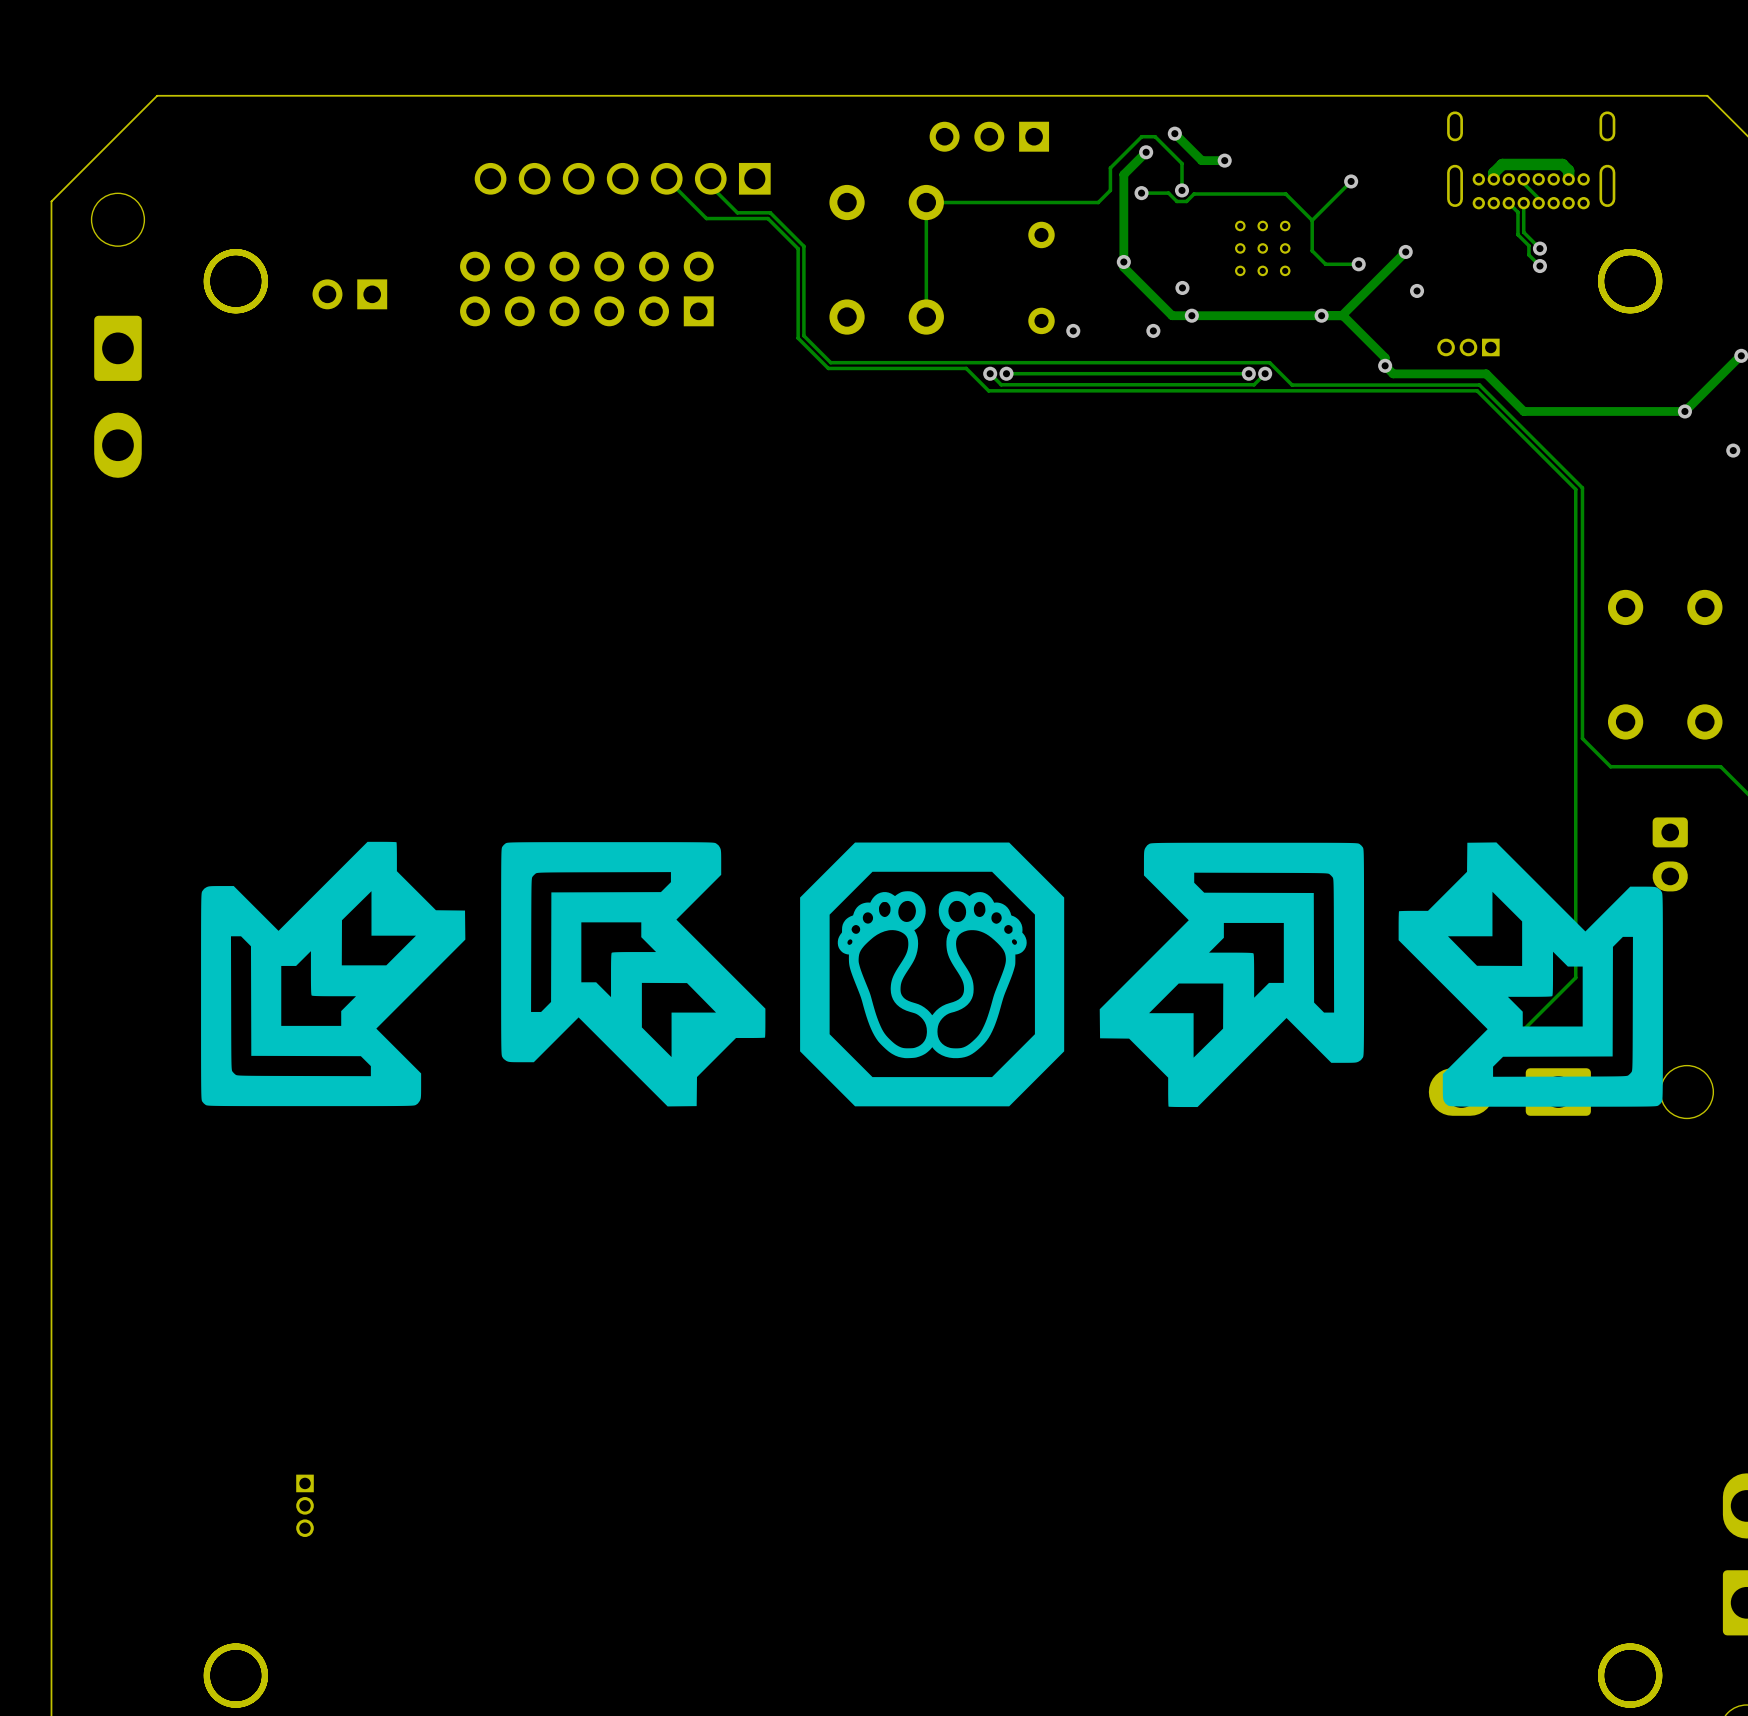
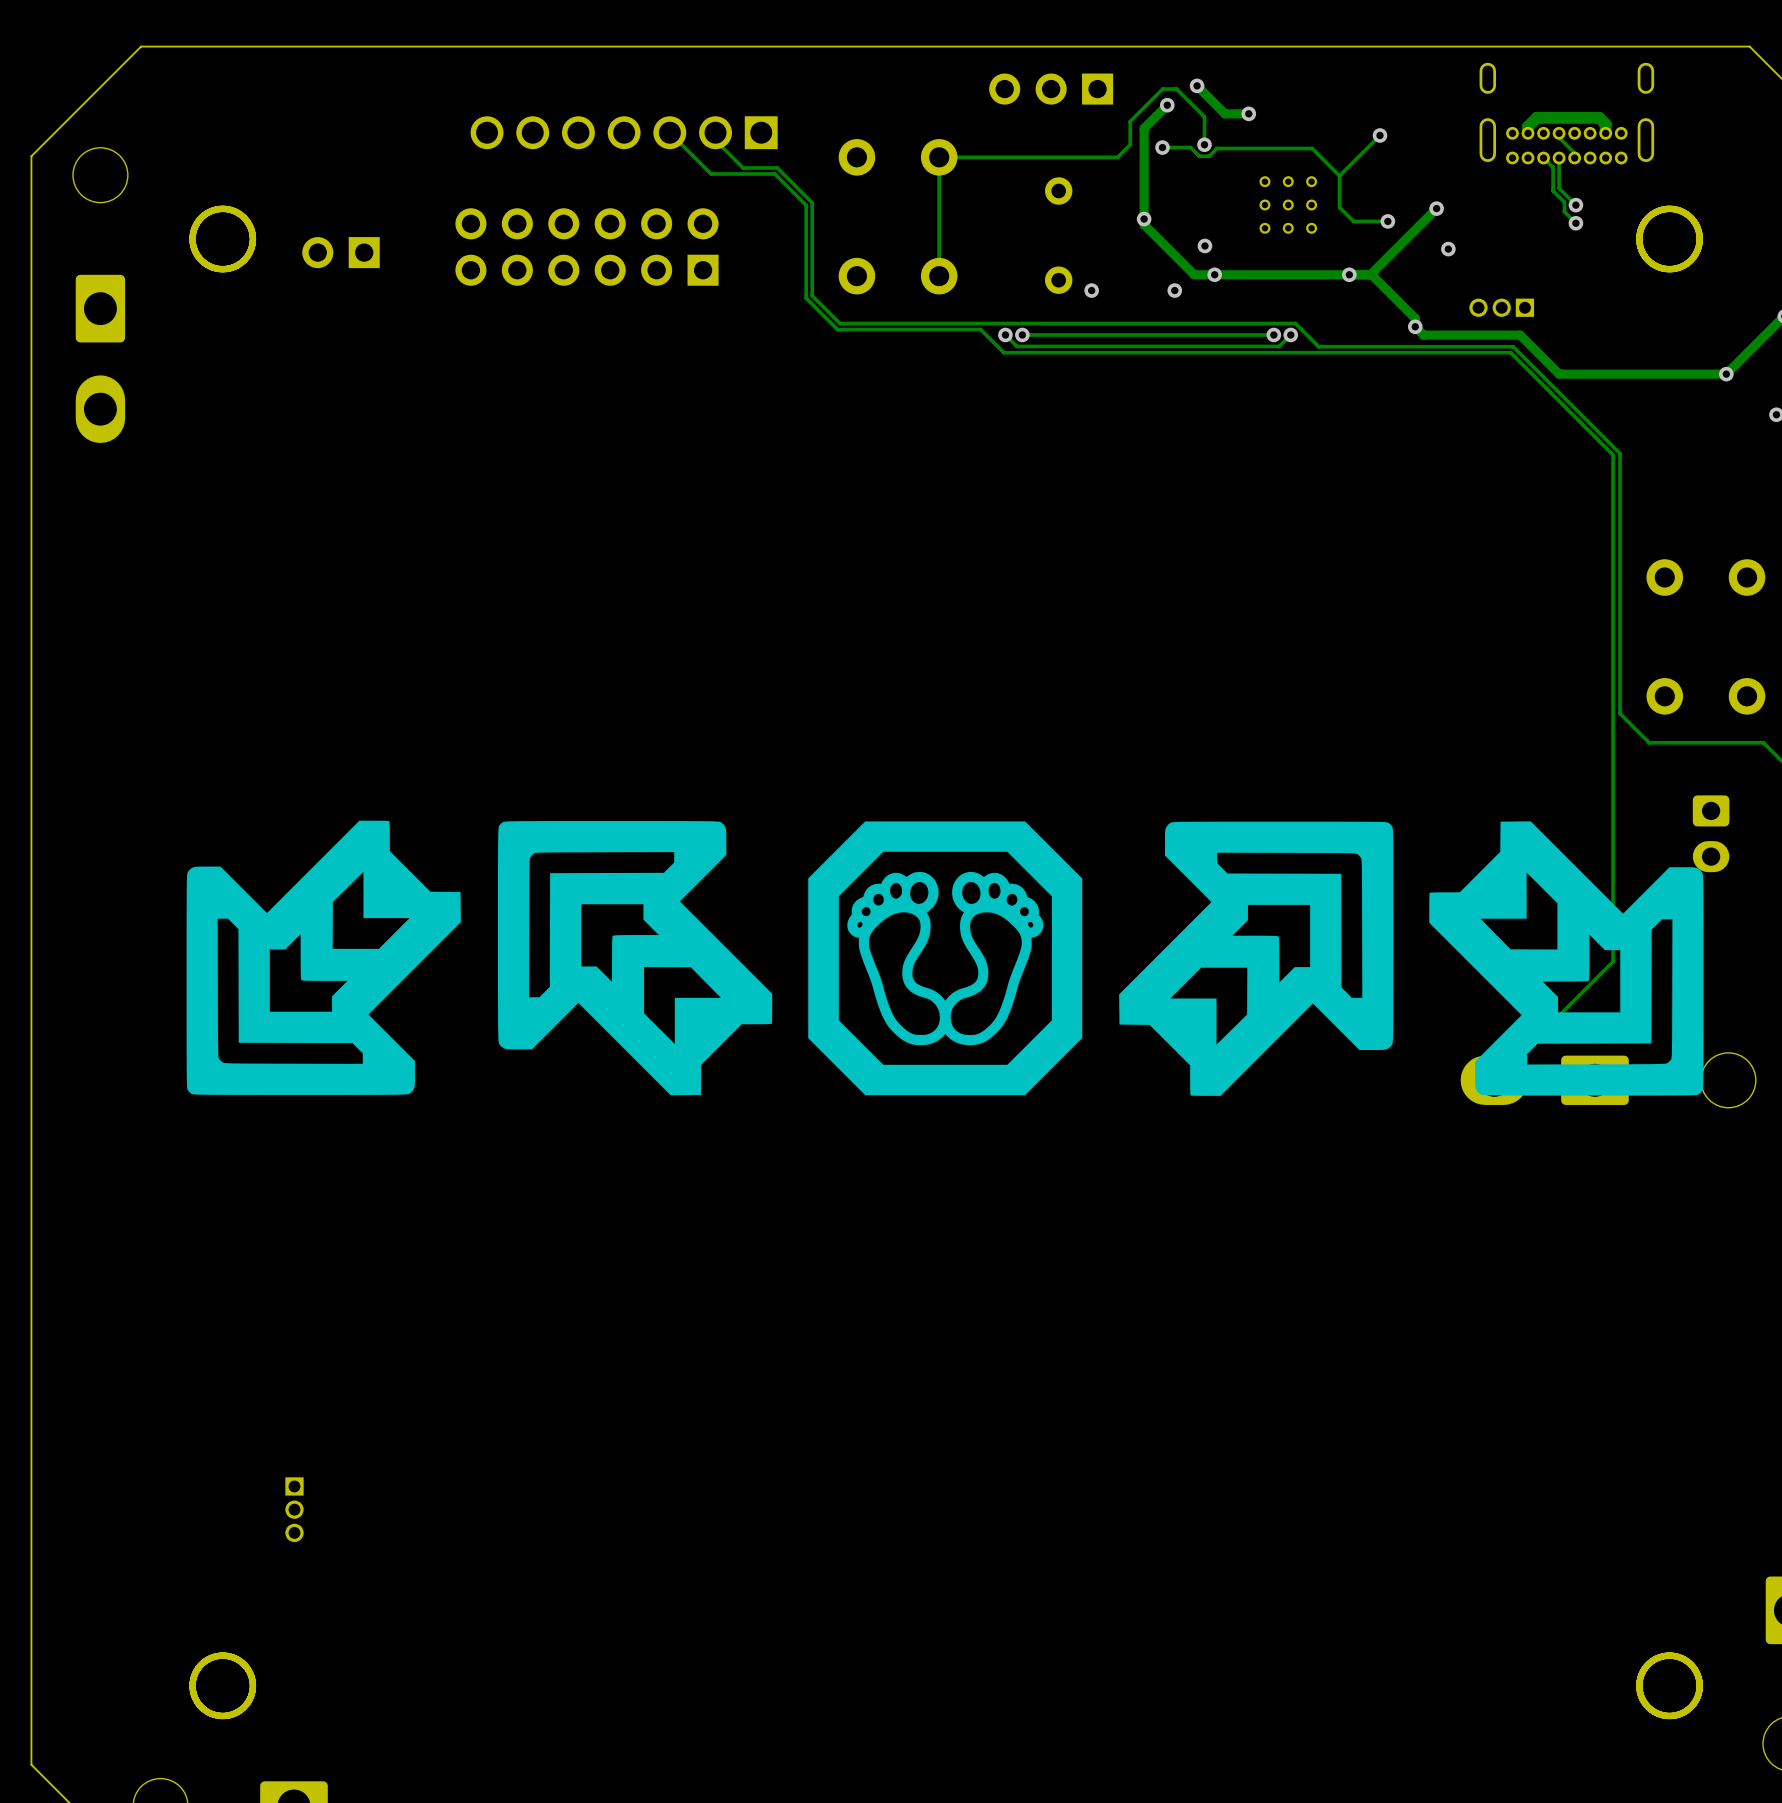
part position: (989, 136) -> (1051, 89)

